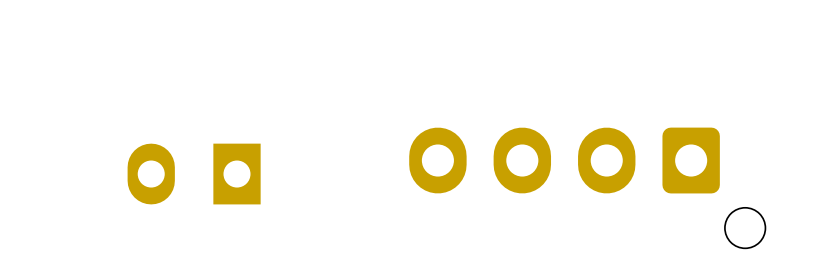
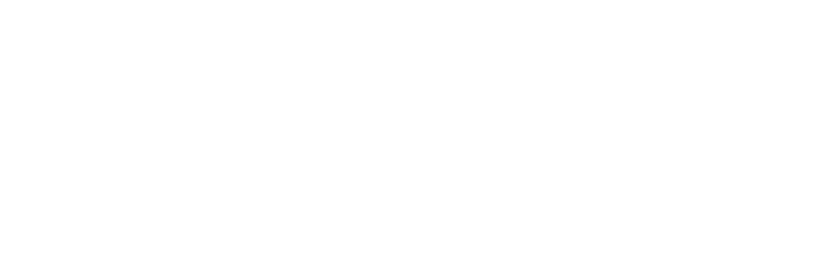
part: (194, 174) -> none
part: (587, 187) -> none

